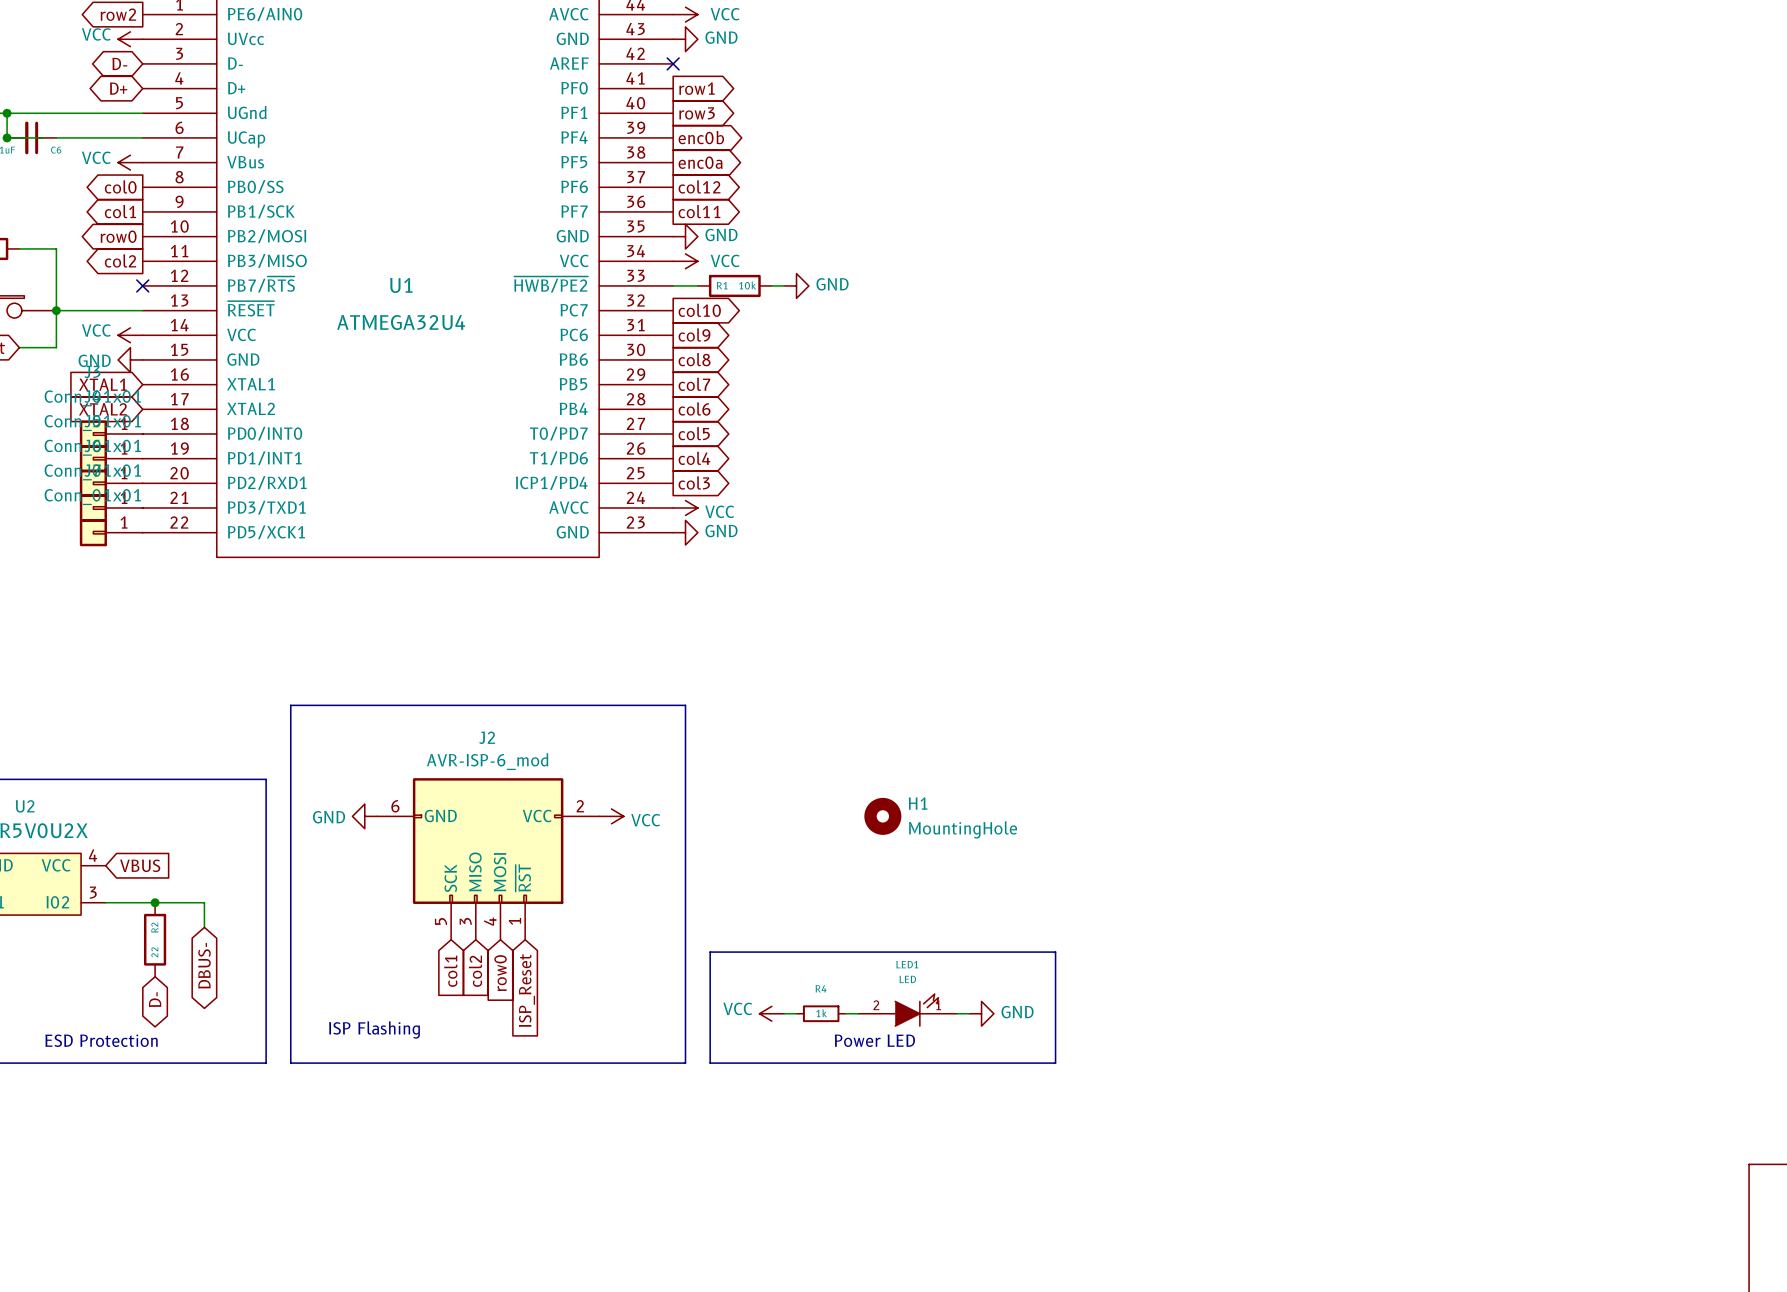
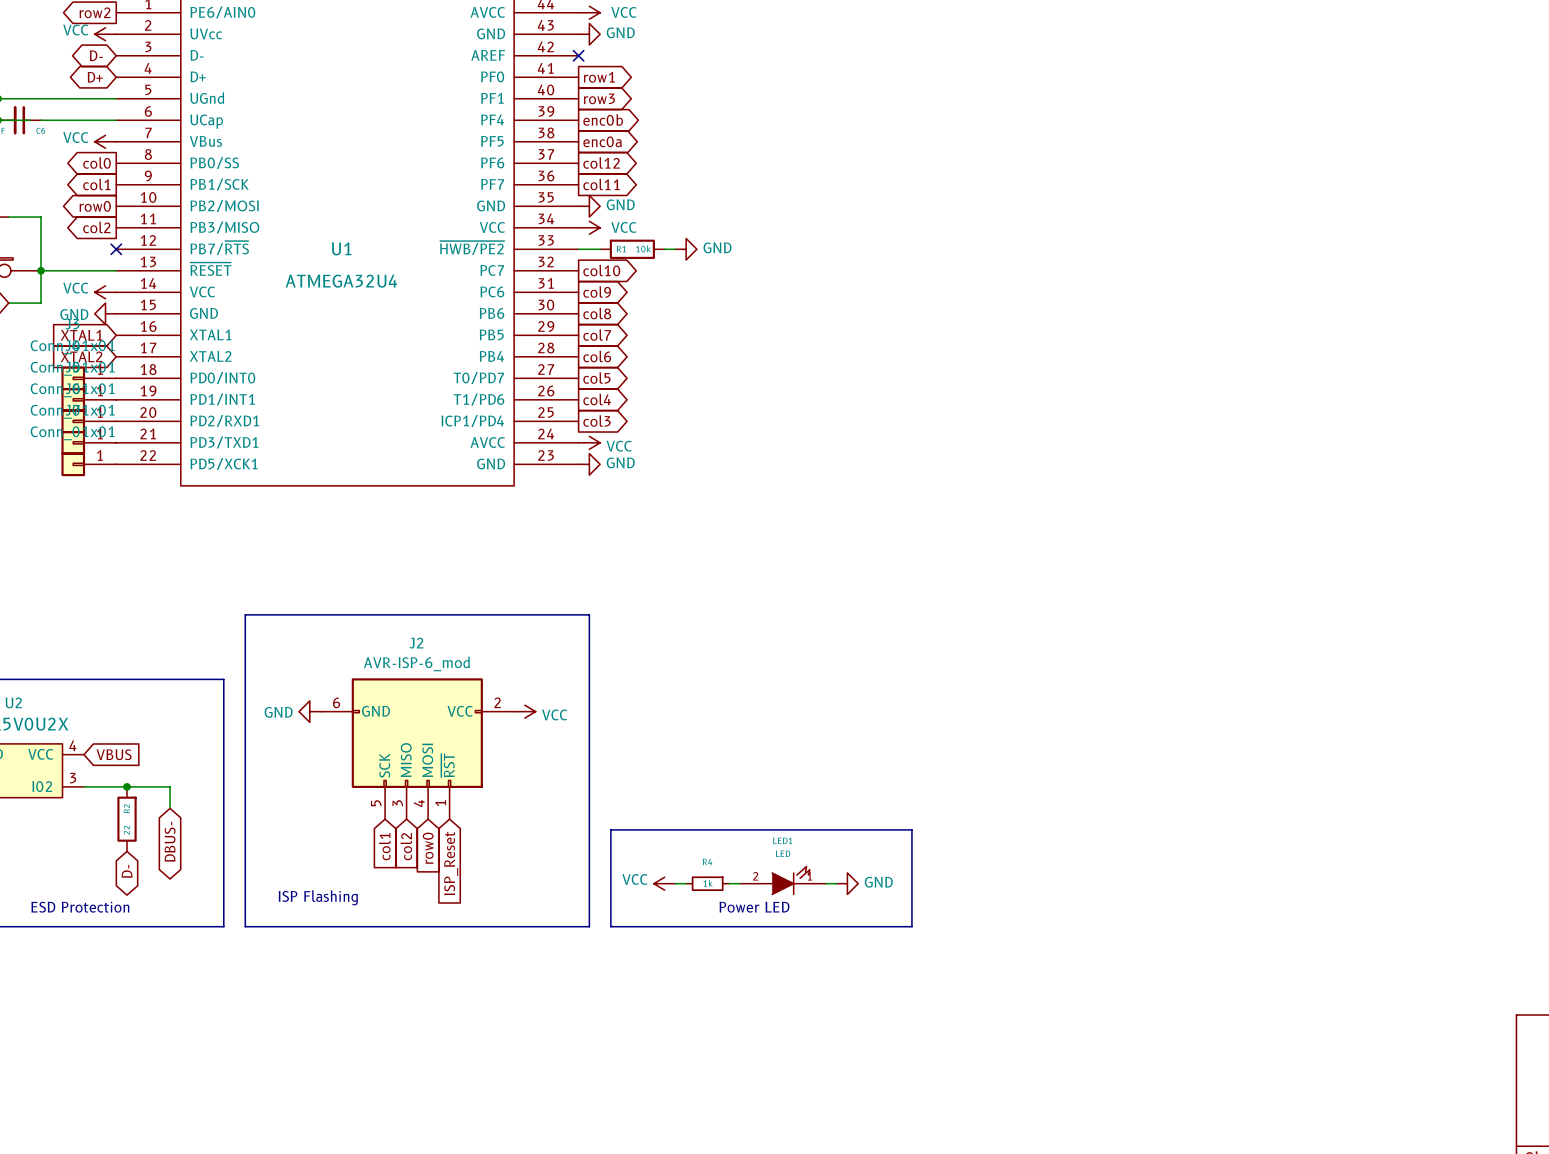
H1: MountingHole (882, 816) -> none

